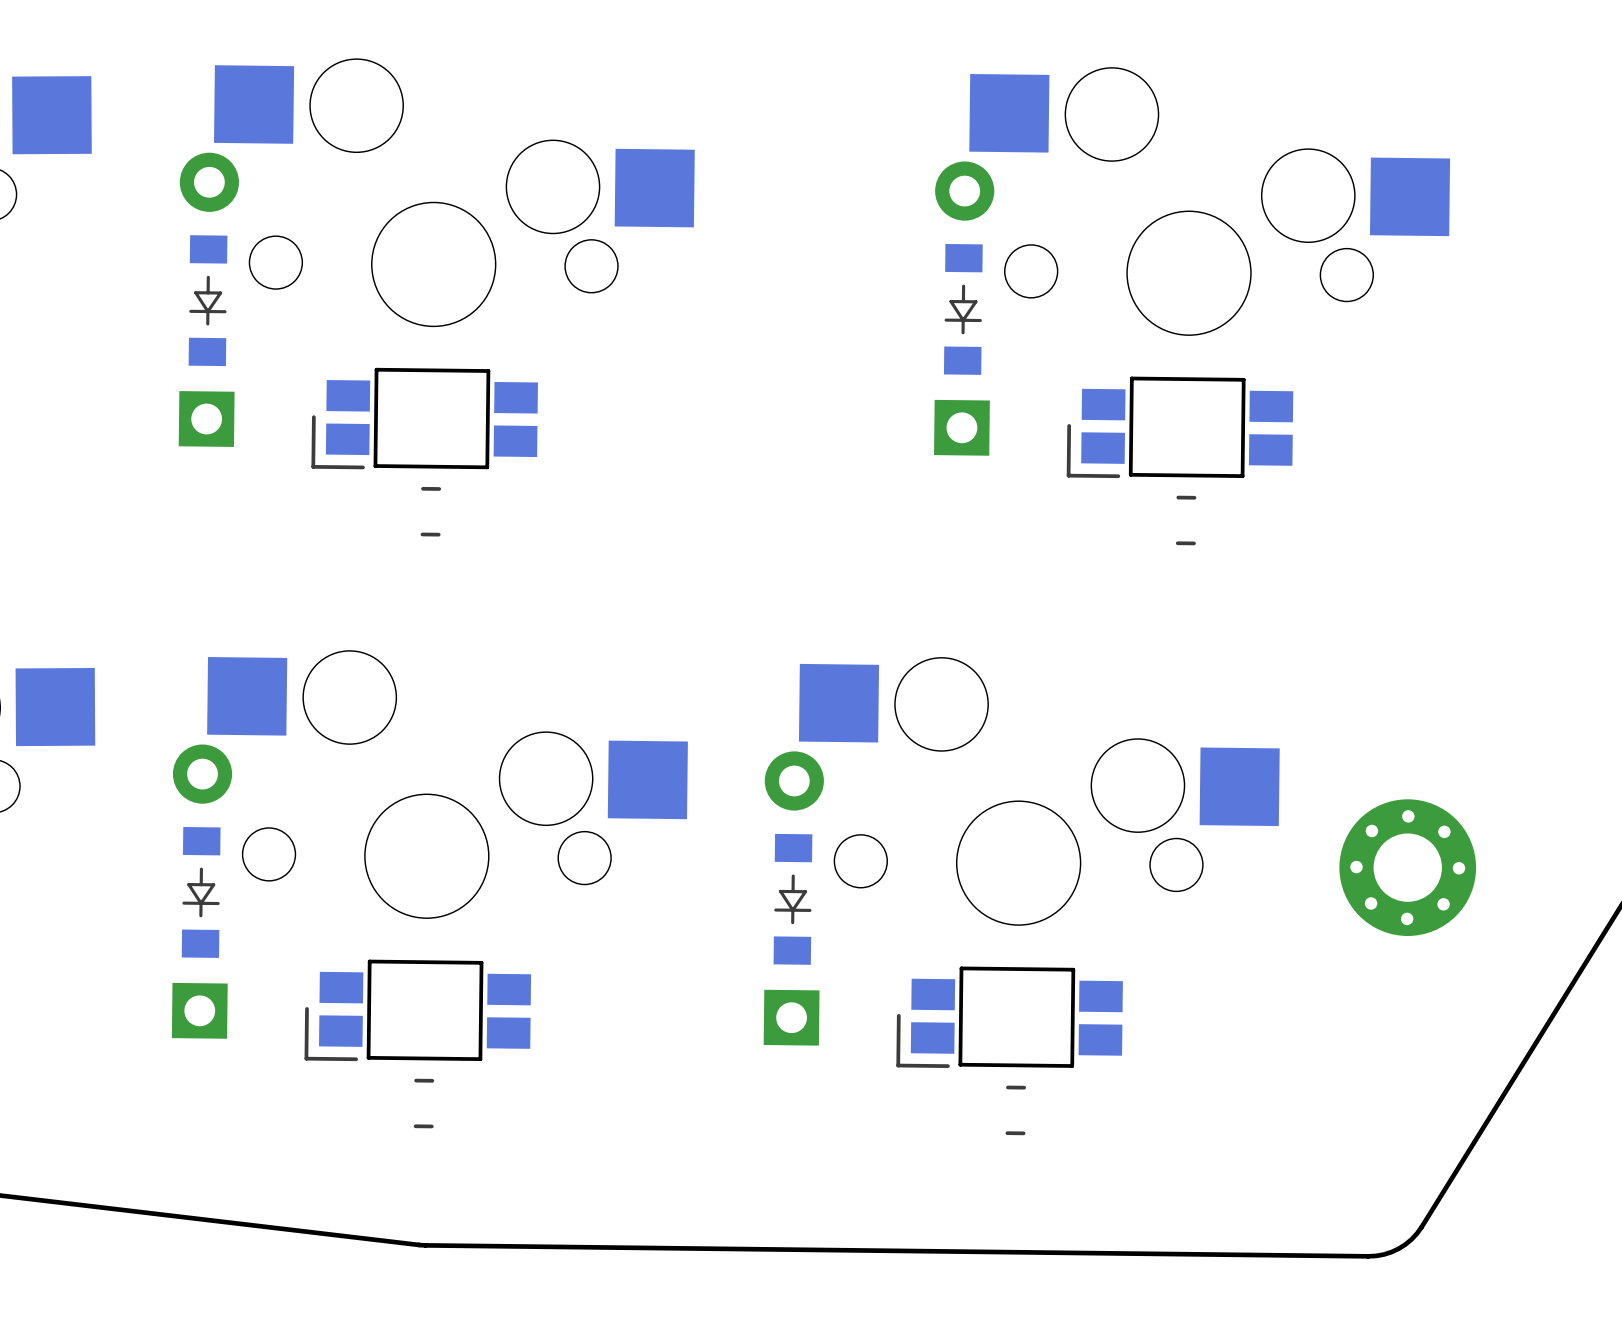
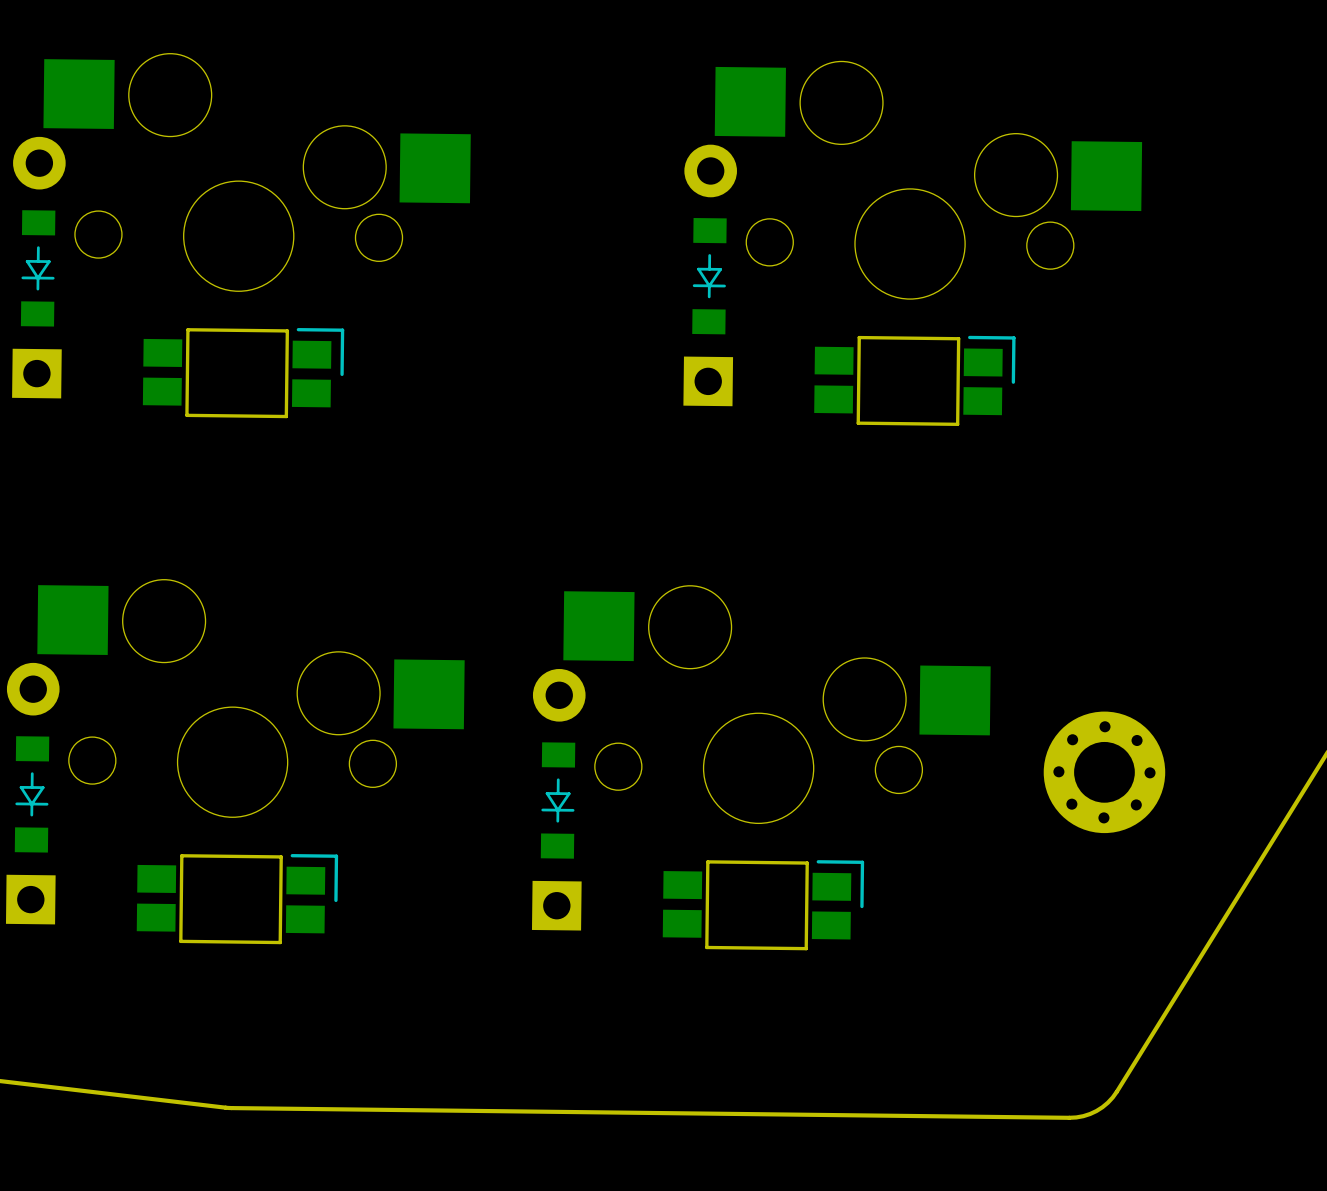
part rotation: 0° (424, 418) -> 180° (243, 373)
part rotation: 0° (1180, 427) -> 180° (914, 380)
part: (430, 511) -> none
part: (1186, 520) -> none
part rotation: 0° (417, 1010) -> 180° (237, 899)
part rotation: 0° (1009, 1017) -> 180° (763, 905)
part: (423, 1103) -> none
part: (1015, 1110) -> none

